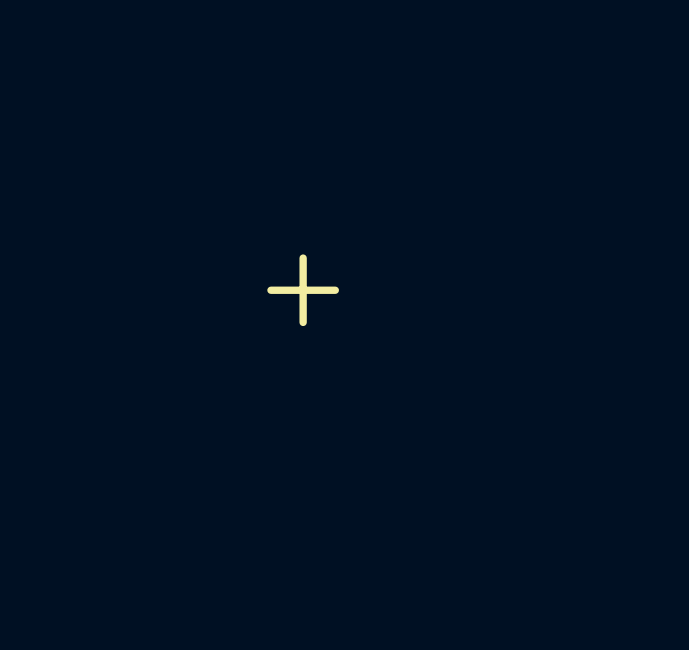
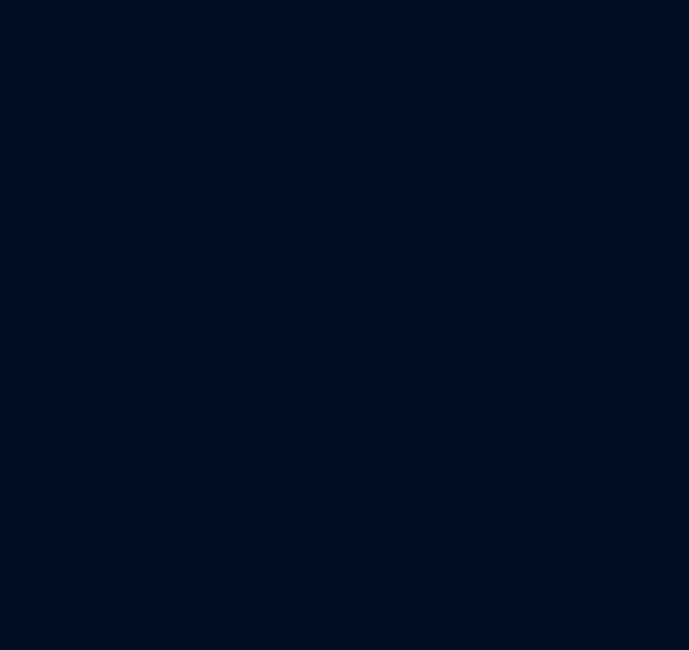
text: + (303, 290) -> none

